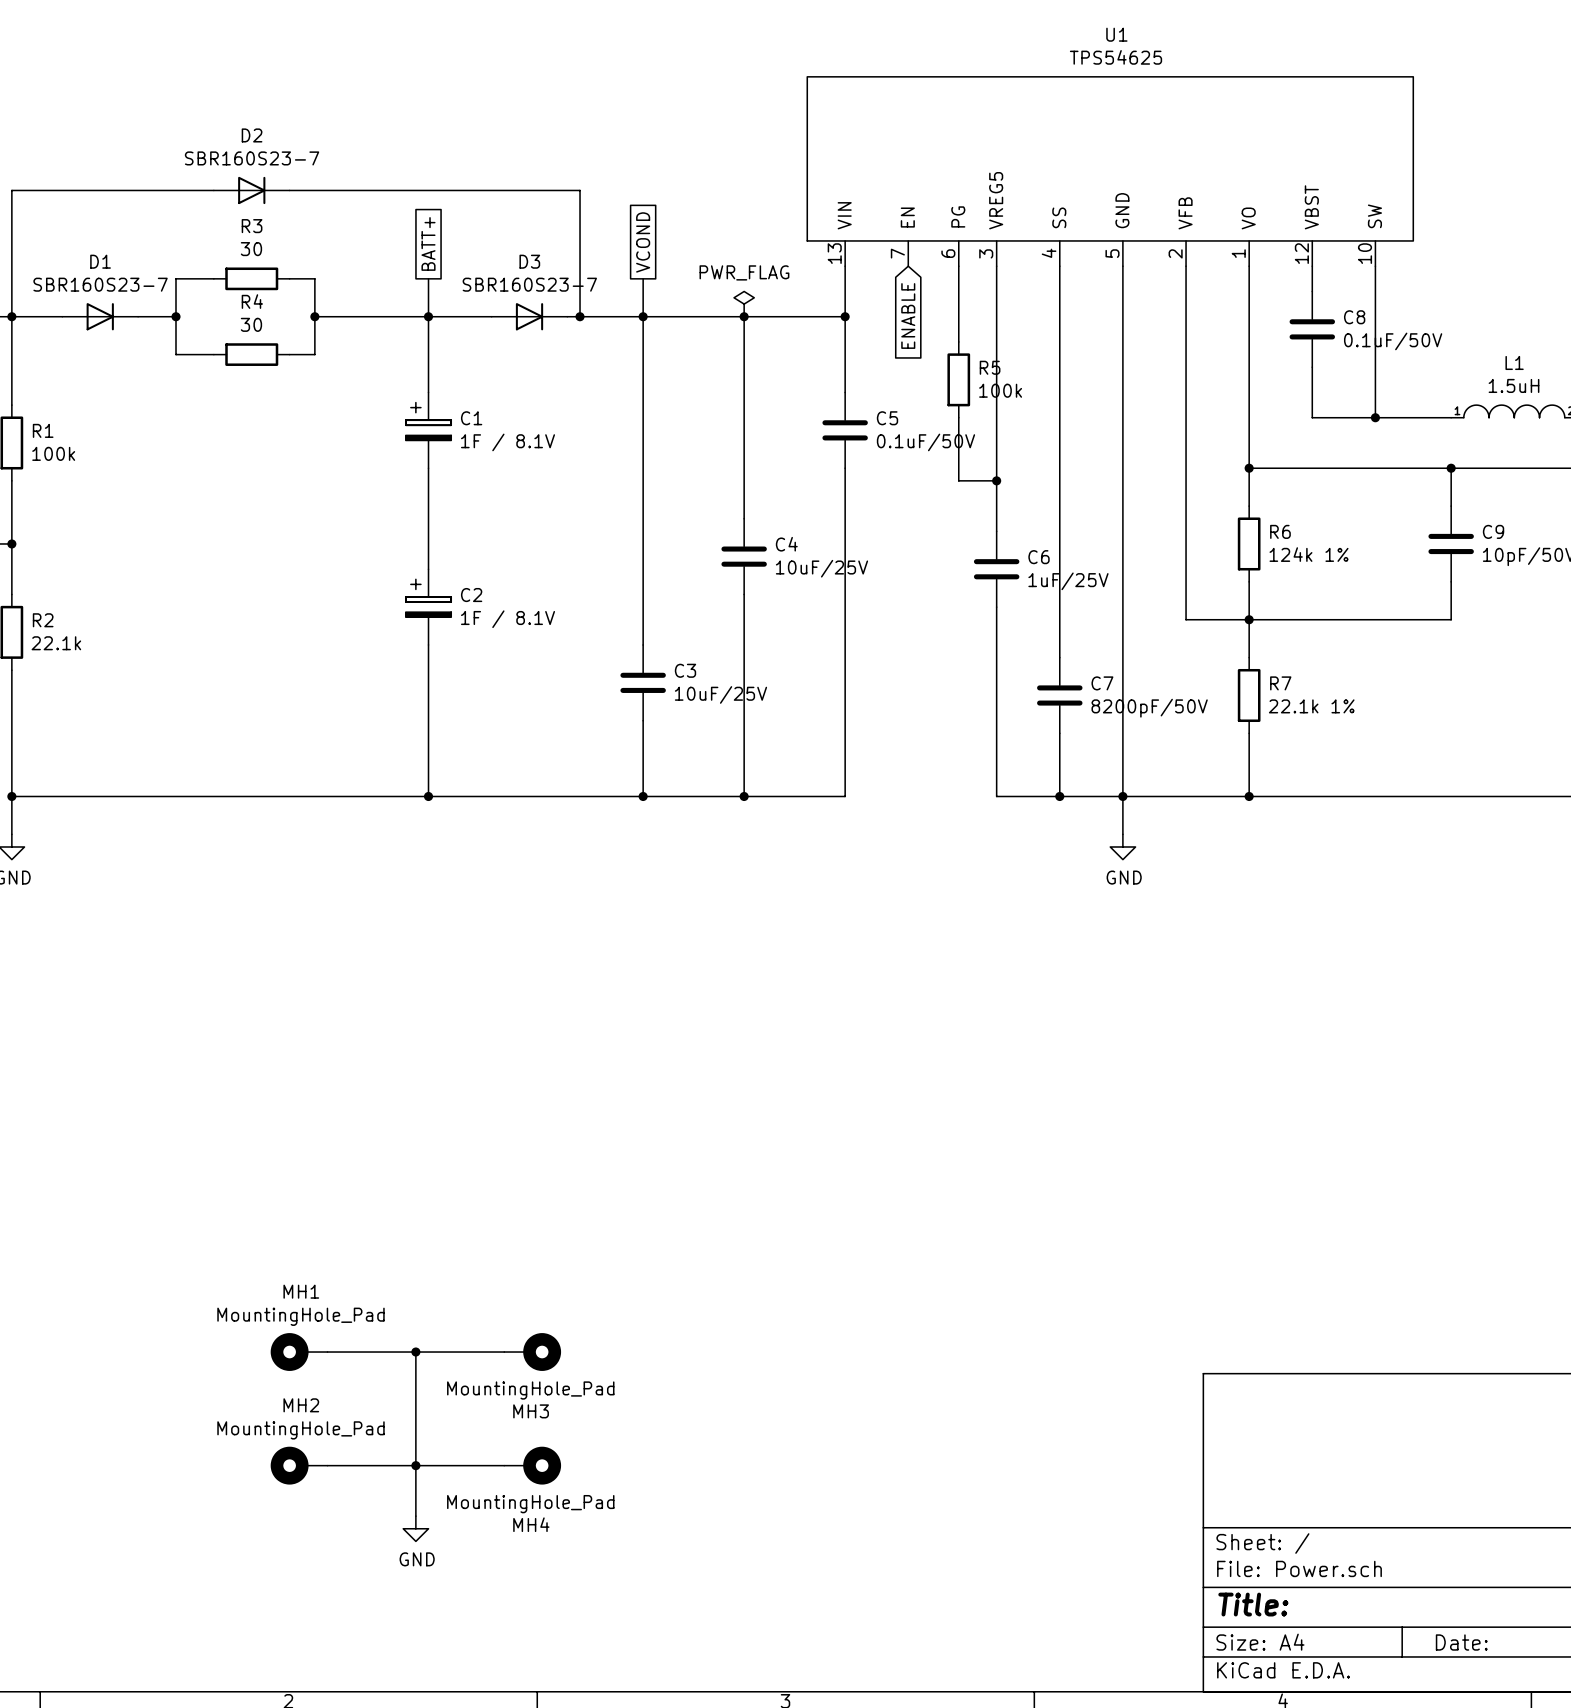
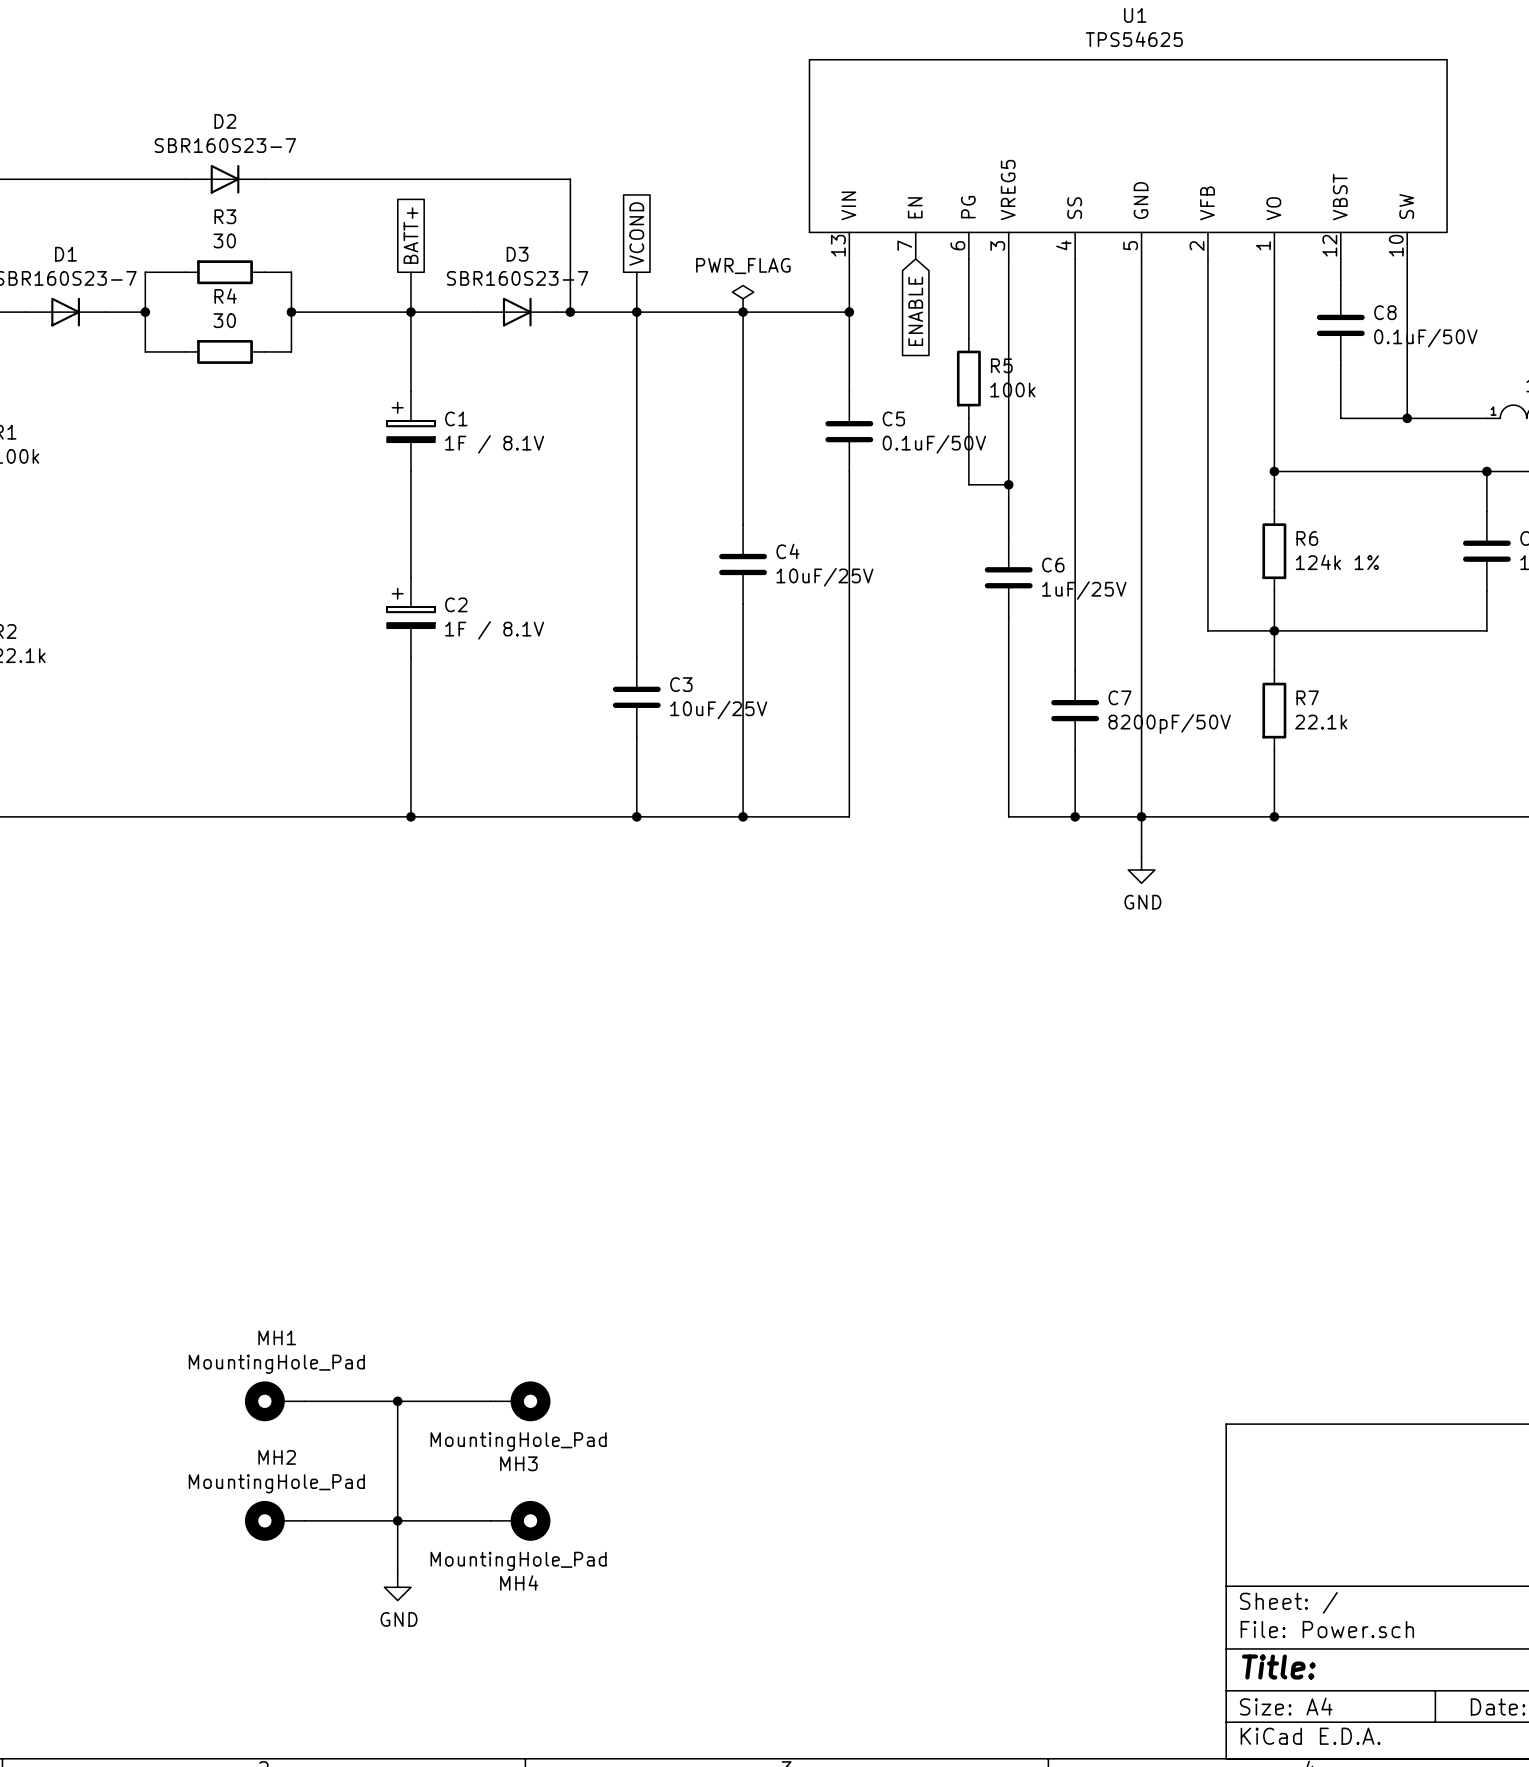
R7 value: 22.1k 1% (1311, 706) -> 22.1k (1321, 722)

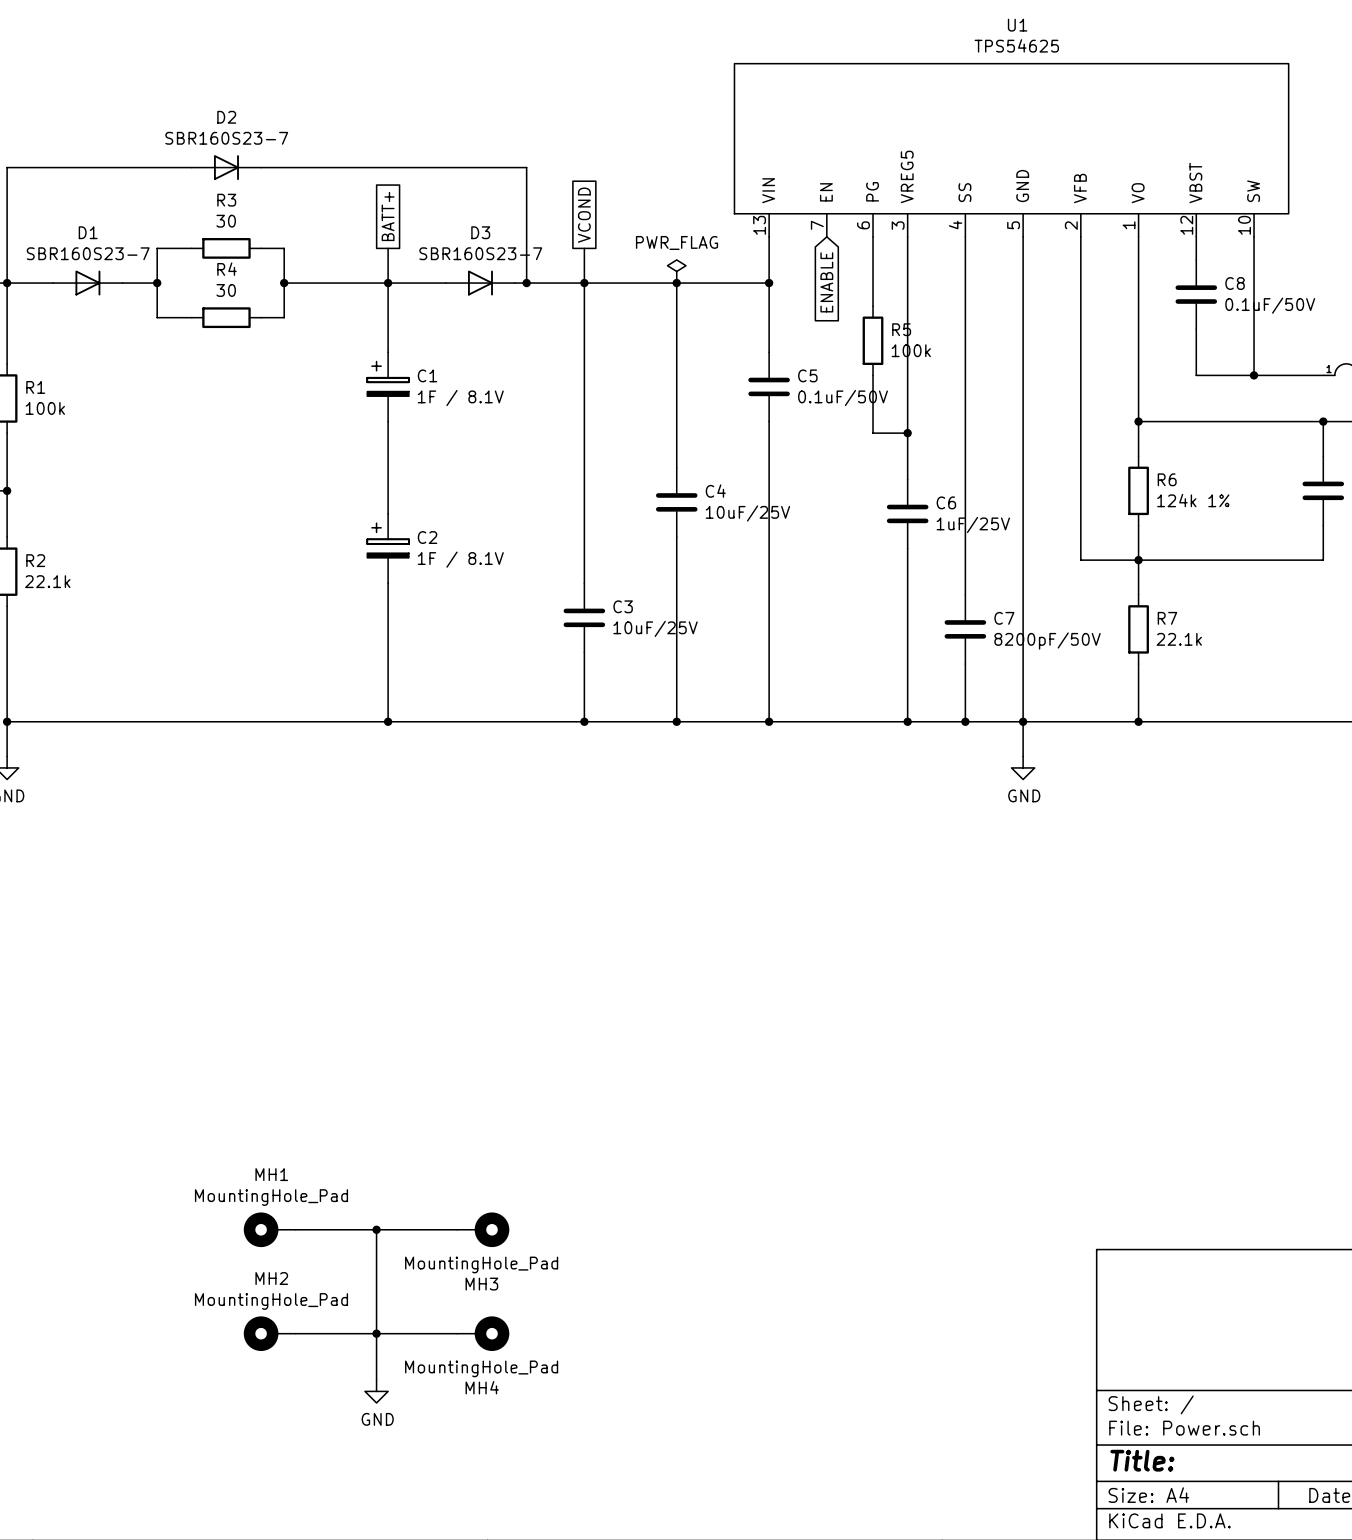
wire: none -> (769, 721) (907, 721)
junction: none -> (769, 721)
junction: none -> (907, 721)

